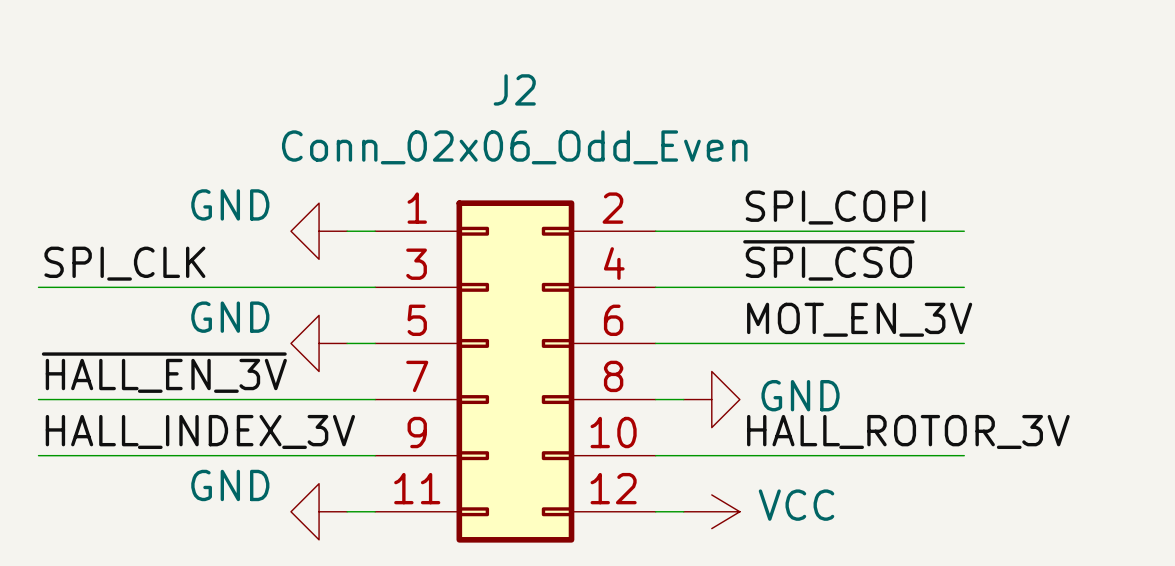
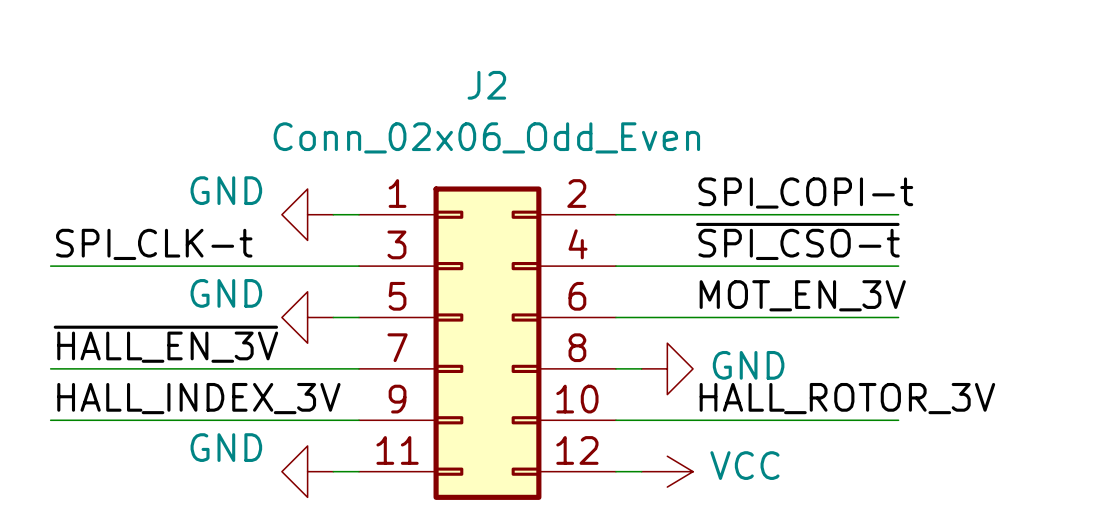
label: SPI_COPI (835, 207) -> SPI_COPI-t (805, 193)
label: ~{SPI_CSO} (828, 260) -> ~{SPI_CSO-t} (797, 241)
label: SPI_CLK (124, 263) -> SPI_CLK-t (154, 244)

